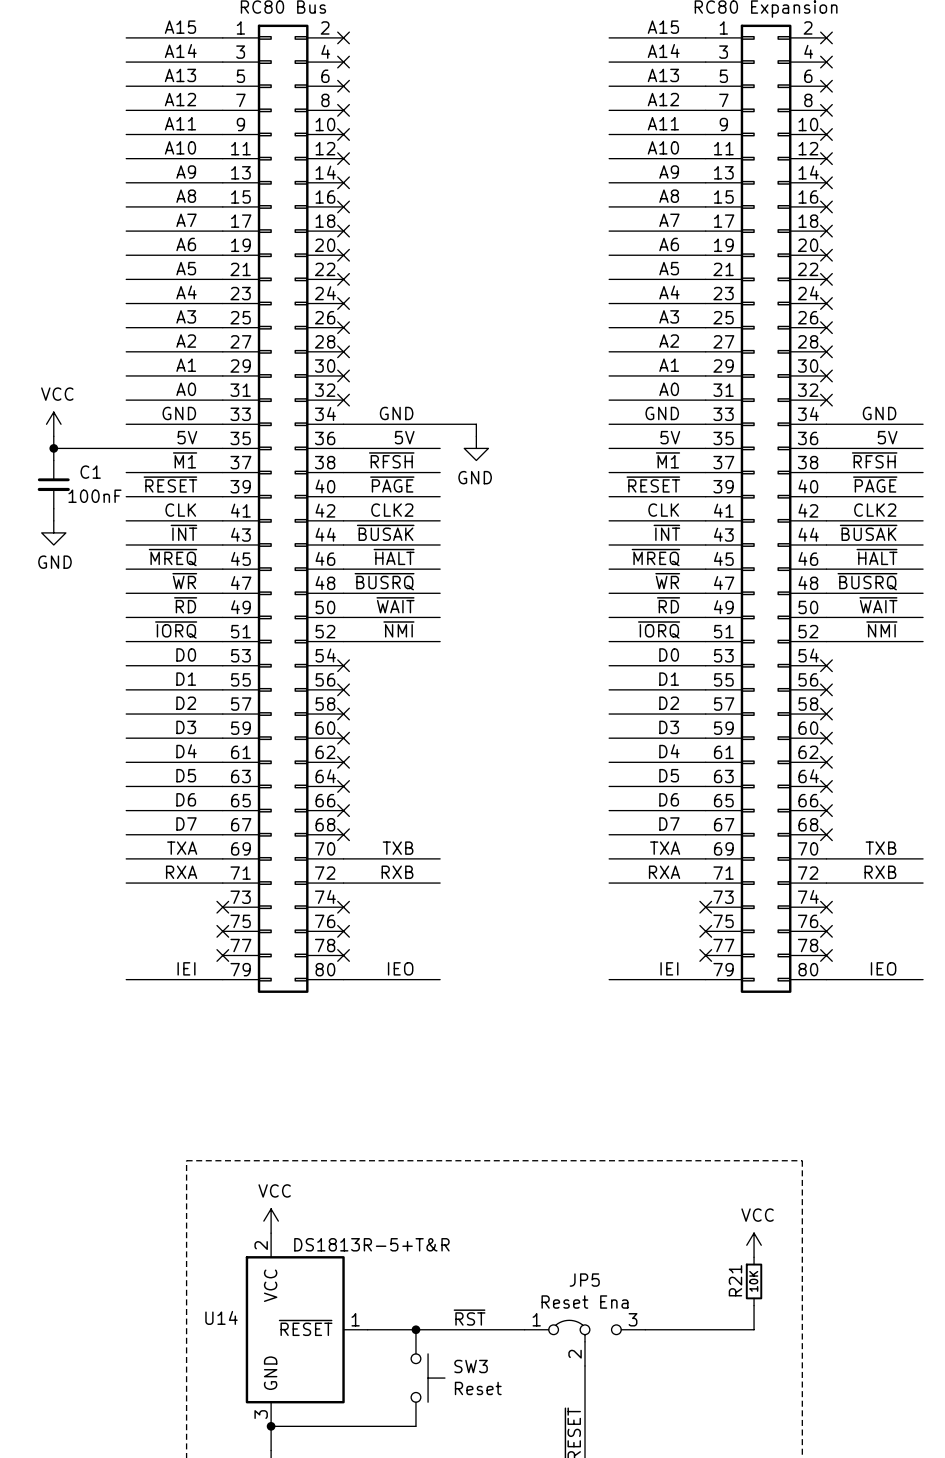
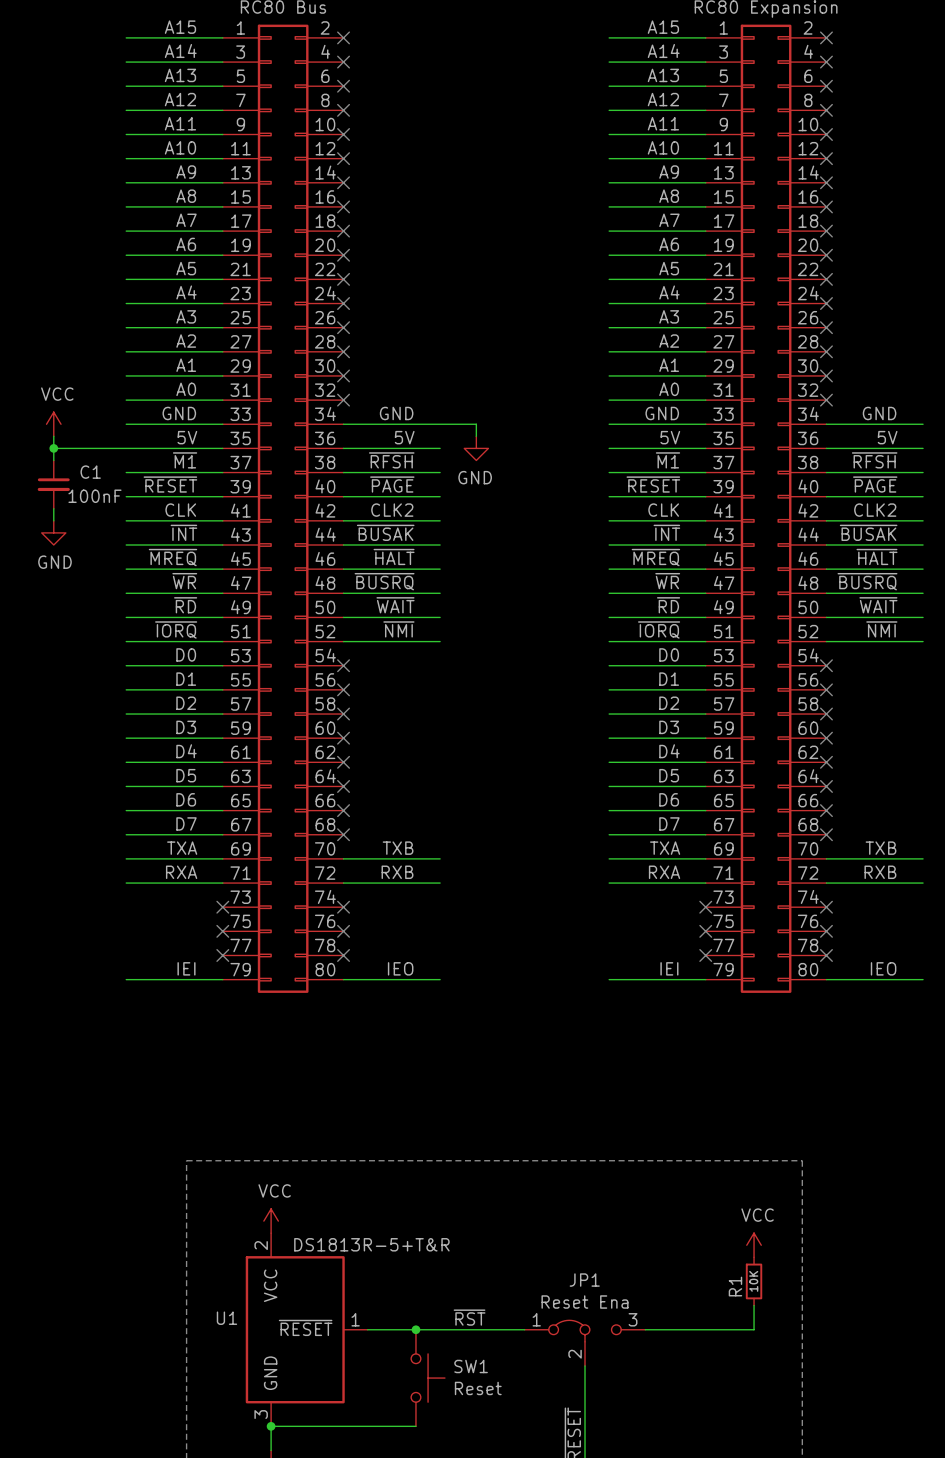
JP5 name: JP5 (584, 1280) -> JP1 (584, 1280)
R21 name: R21 (735, 1280) -> R1 (735, 1286)
U14 name: U14 (221, 1317) -> U1 (226, 1318)
SW3 name: SW3 (471, 1366) -> SW1 (471, 1366)

